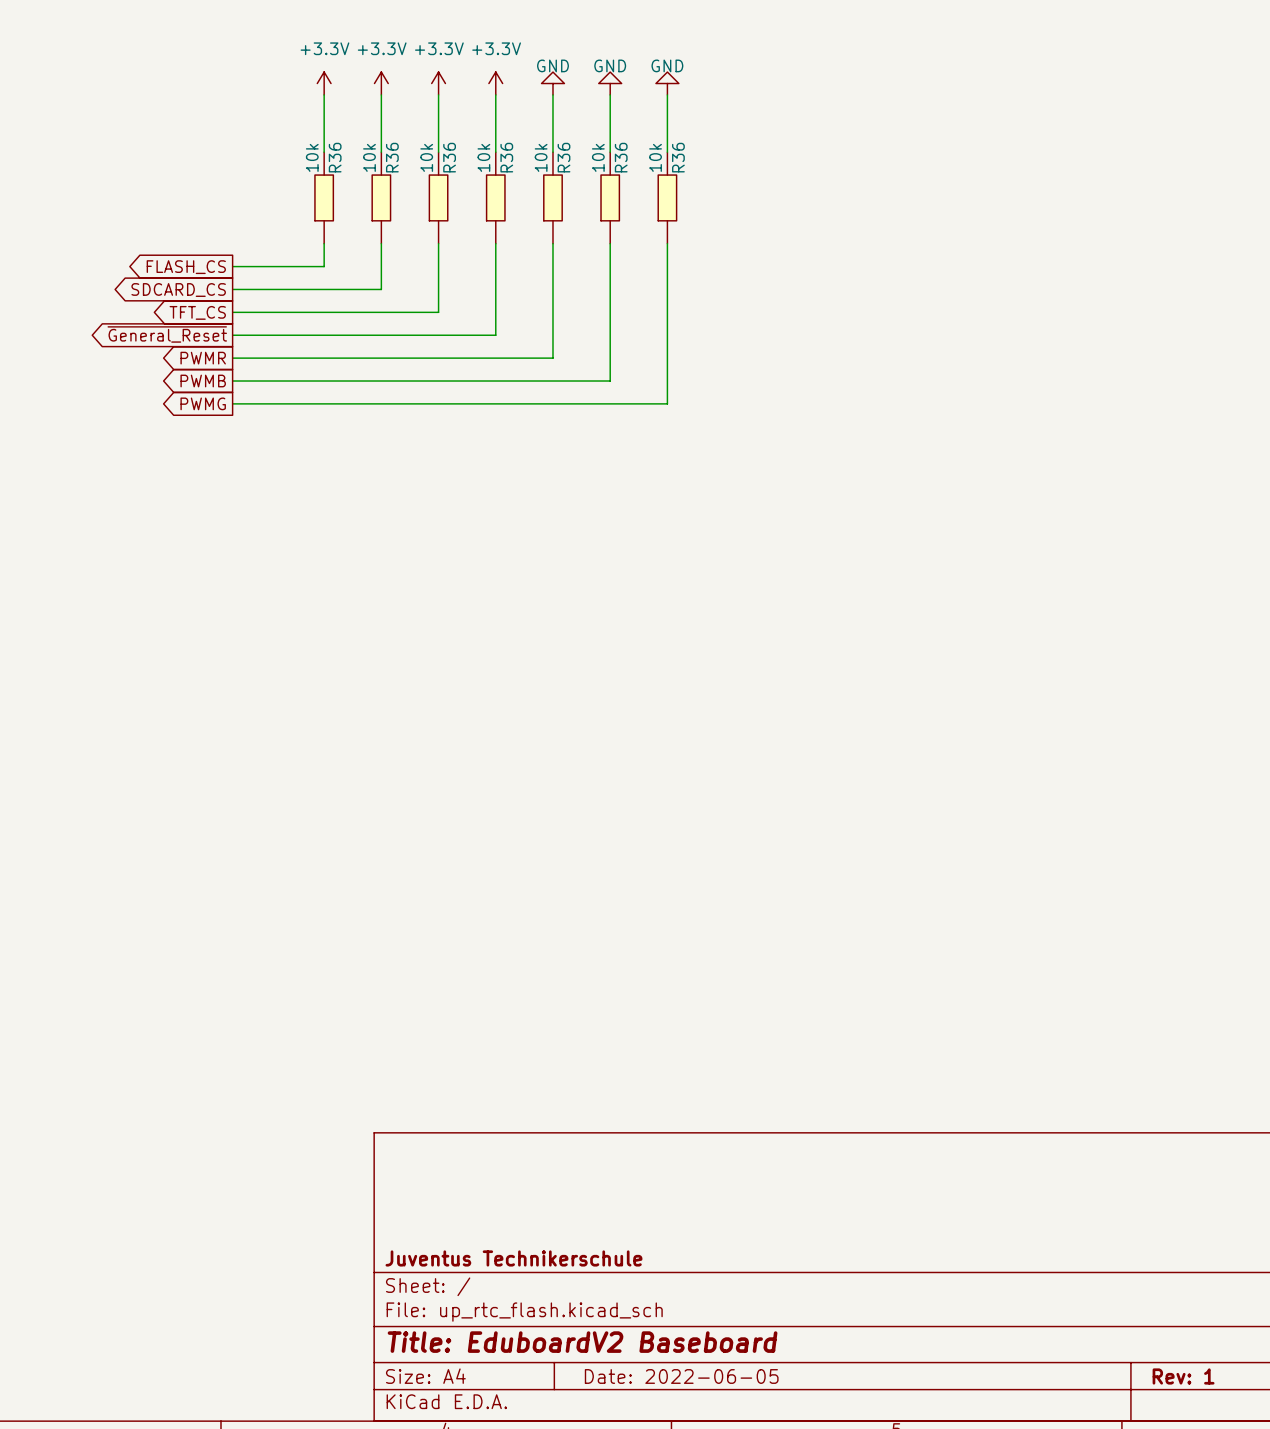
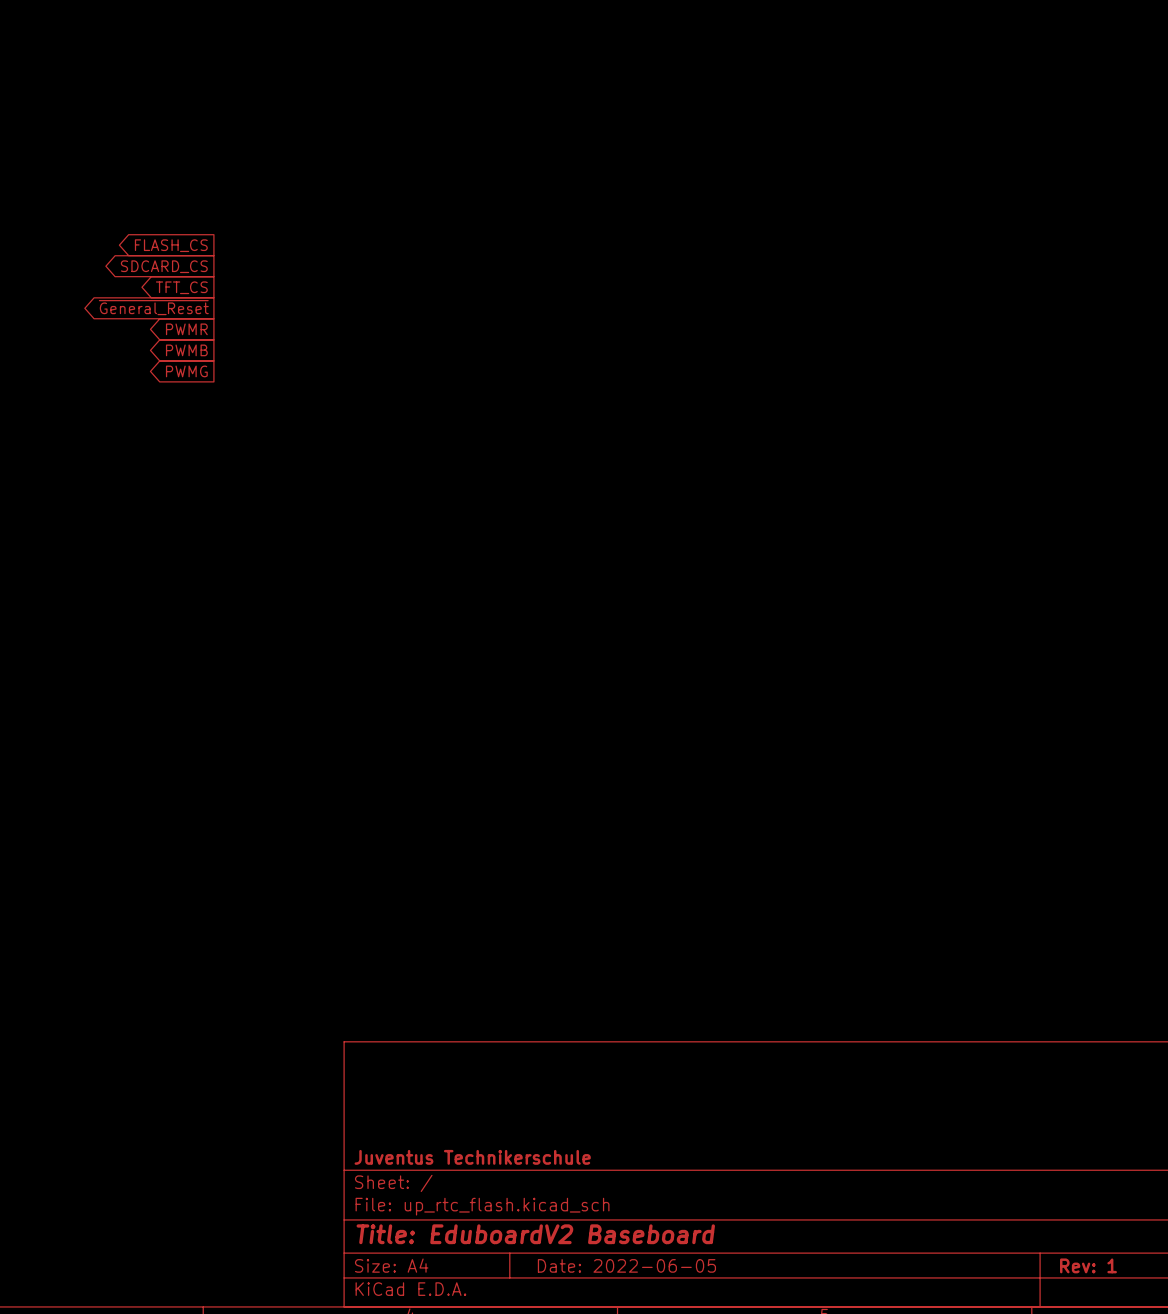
power symbol: +3.3V (324, 83) -> none
power symbol: +3.3V (381, 83) -> none
power symbol: +3.3V (438, 83) -> none
power symbol: +3.3V (495, 83) -> none
power symbol: GND (552, 83) -> none
power symbol: GND (610, 83) -> none
power symbol: GND (667, 83) -> none
wire: (324, 94) (324, 152) -> none
wire: (381, 94) (381, 152) -> none
wire: (438, 94) (438, 152) -> none
wire: (495, 94) (495, 152) -> none
wire: (552, 94) (552, 152) -> none
wire: (610, 94) (610, 152) -> none
wire: (667, 94) (667, 152) -> none
R36: 10k (324, 197) -> none
R36: 10k (381, 197) -> none
R36: 10k (438, 197) -> none
R36: 10k (495, 197) -> none
R36: 10k (552, 197) -> none
R36: 10k (610, 197) -> none
R36: 10k (667, 197) -> none
wire: (324, 243) (324, 266) (232, 266) -> none
wire: (381, 243) (381, 289) (232, 289) -> none
wire: (438, 243) (438, 312) (232, 312) -> none
wire: (495, 243) (495, 335) (232, 335) -> none
wire: (552, 243) (552, 358) (232, 358) -> none
wire: (610, 243) (610, 381) (232, 381) -> none
wire: (667, 243) (667, 403) (232, 403) -> none

